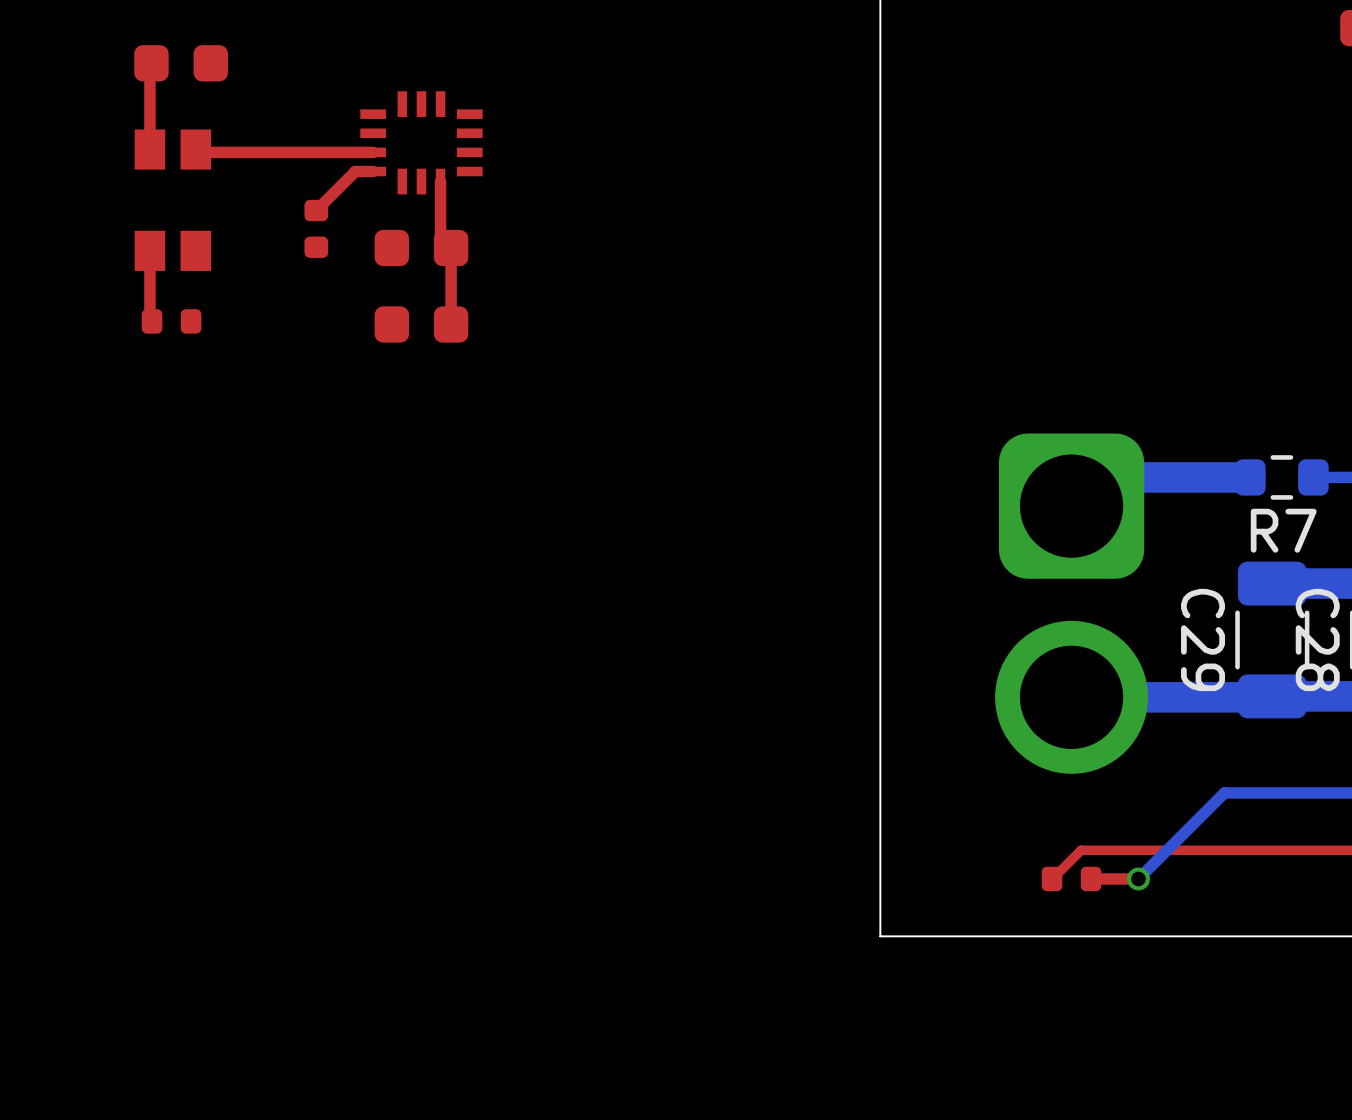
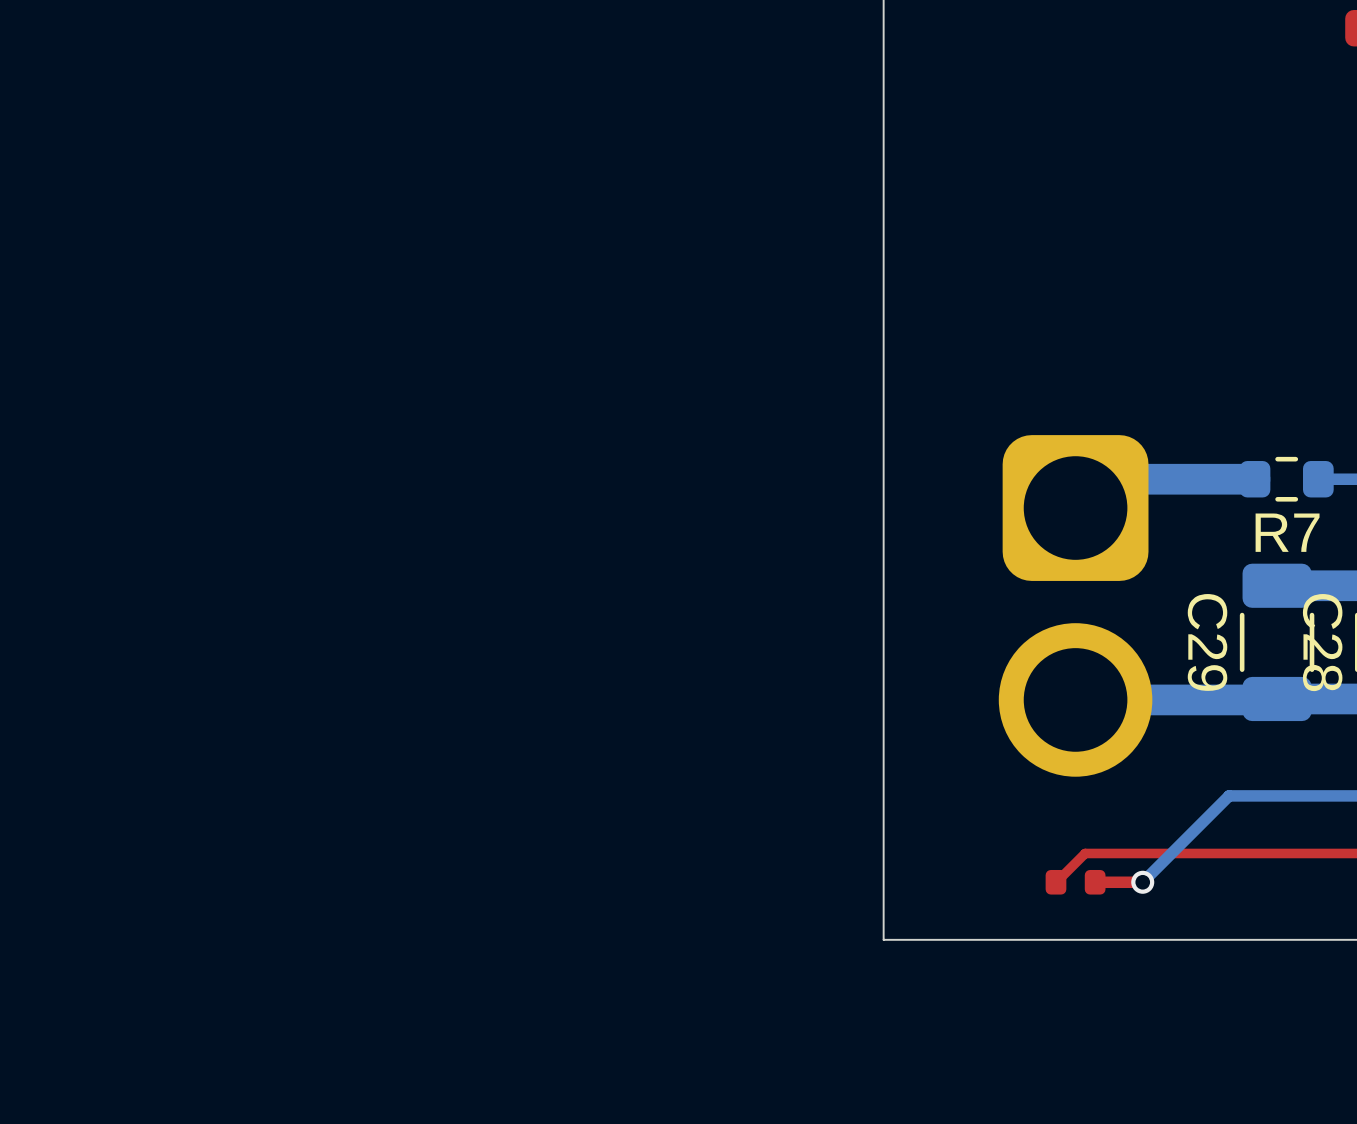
top track: (151, 63) (149, 64) (149, 149) -> none
part: (181, 63) -> none
part: (421, 142) -> none
top track: (195, 149) (198, 152) (373, 152) -> none
top track: (373, 171) (355, 171) (316, 210) -> none
top track: (440, 181) (440, 237) (451, 248) (451, 324) -> none
part: (172, 200) -> none
part: (316, 228) -> none
part: (421, 248) -> none
top track: (149, 250) (149, 319) (152, 321) -> none
part: (171, 321) -> none
part: (421, 324) -> none

